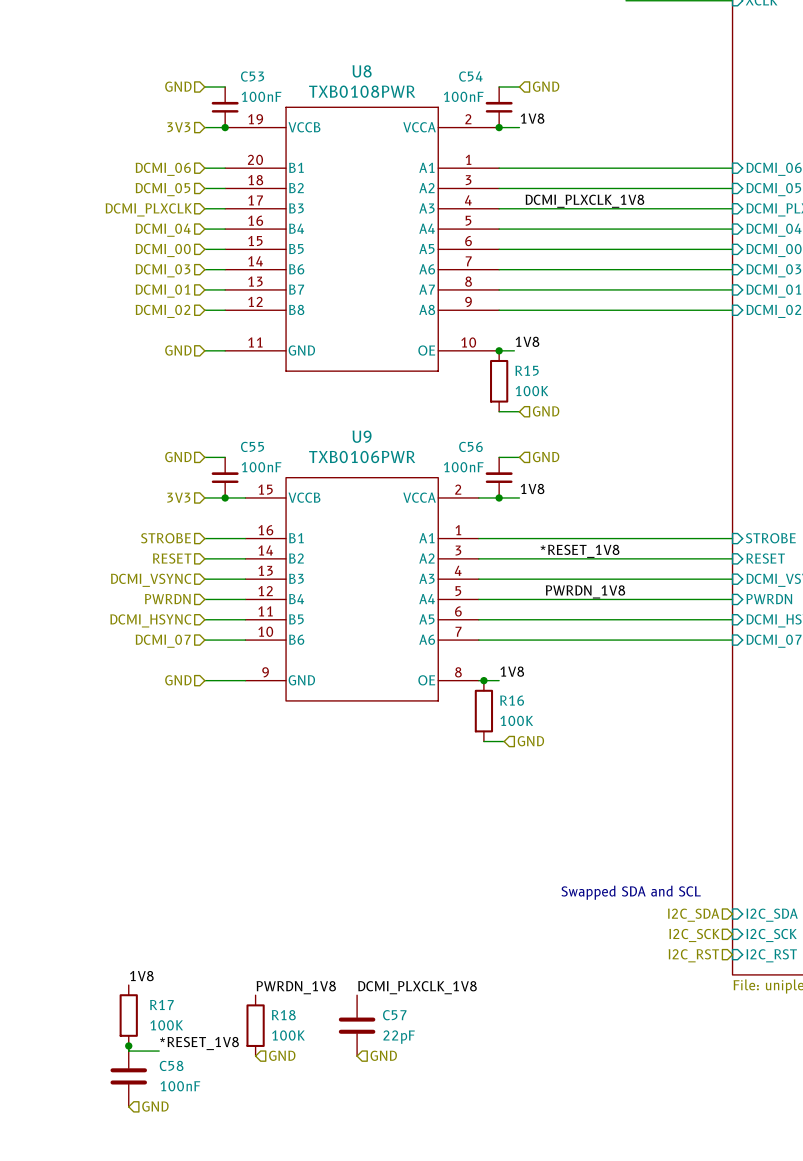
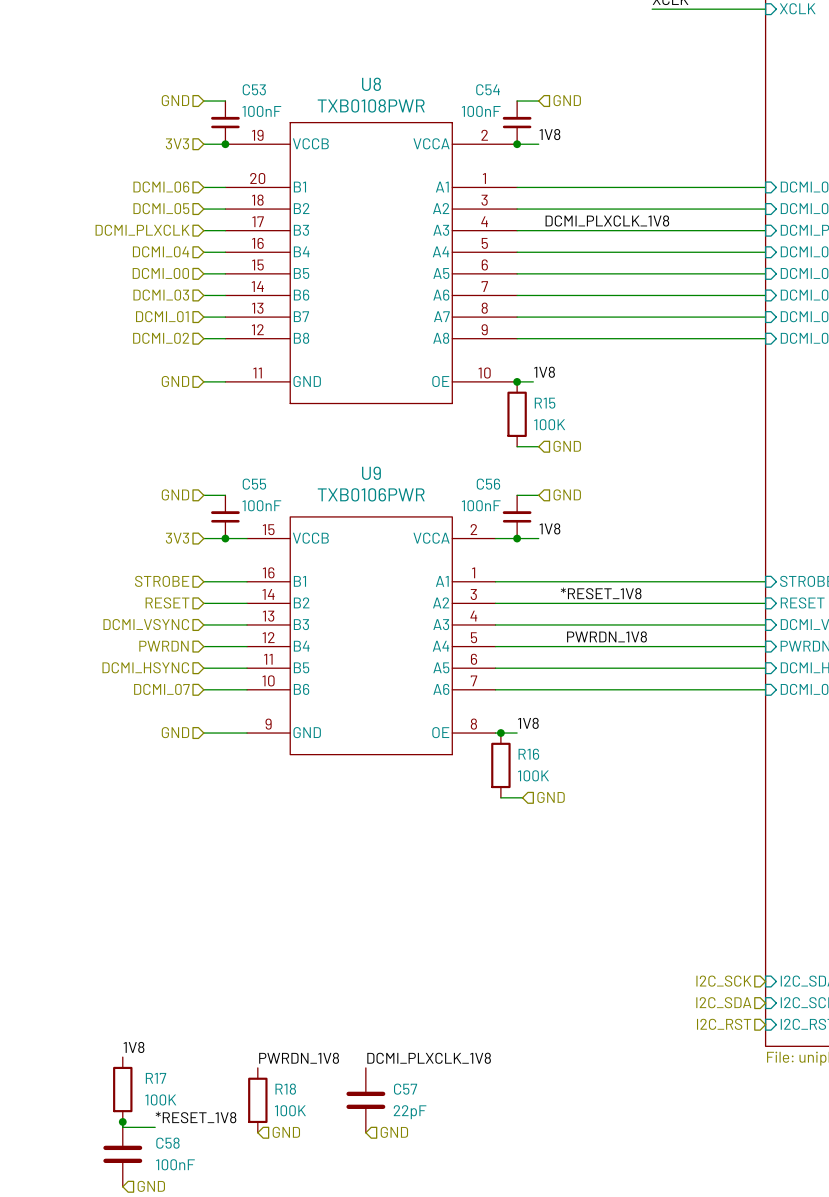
text: Swapped SDA and SCL (631, 892) -> none
hierarchical label: I2C_SDA (693, 915) -> I2C_SCK (723, 981)
hierarchical label: I2C_SCK (694, 935) -> I2C_SDA (723, 1002)

